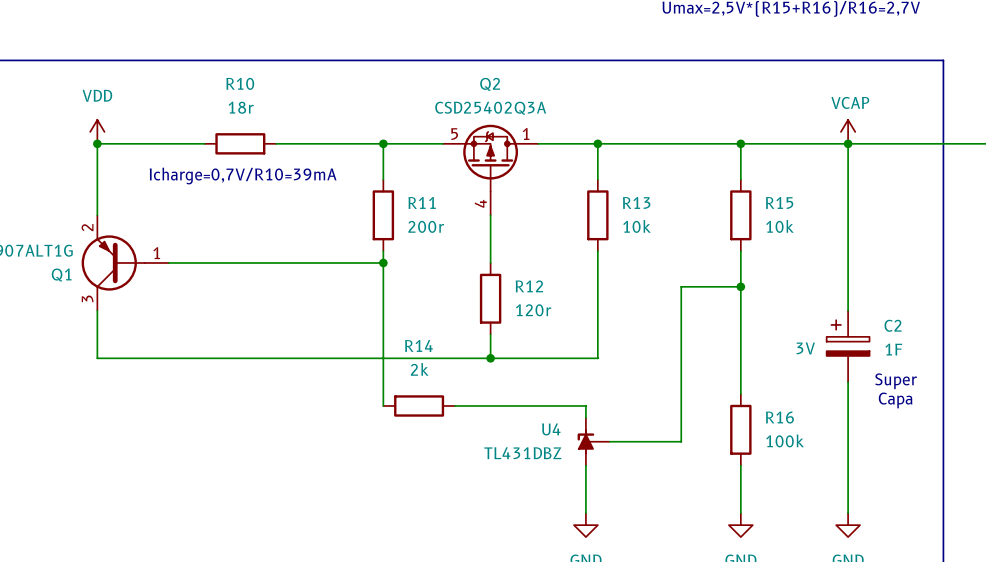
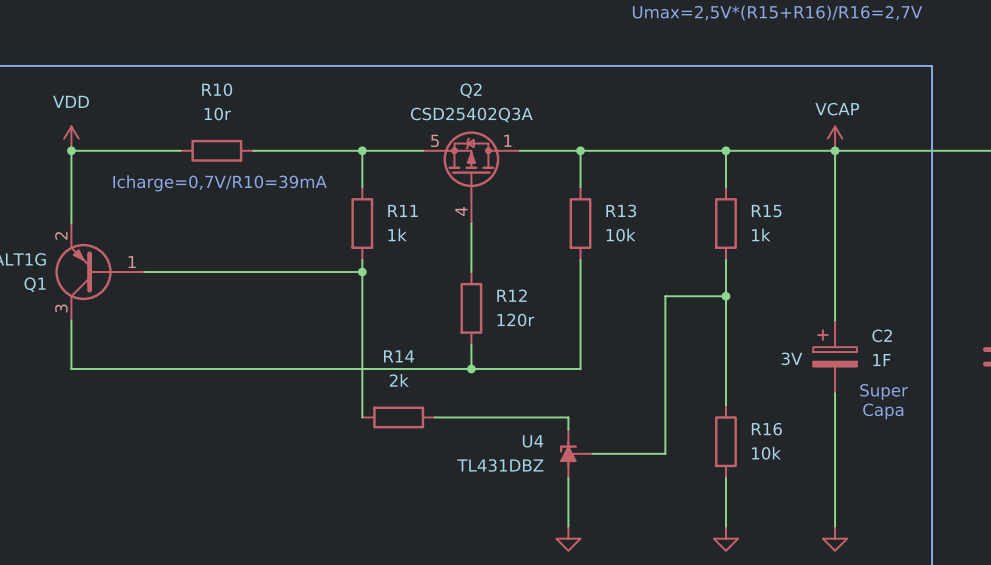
R10 value: 18r (241, 107) -> 10r (217, 113)
R11 value: 200r (426, 226) -> 1k (397, 234)
R15 value: 10k (779, 226) -> 1k (761, 234)
R16 value: 100k (785, 440) -> 10k (766, 453)

